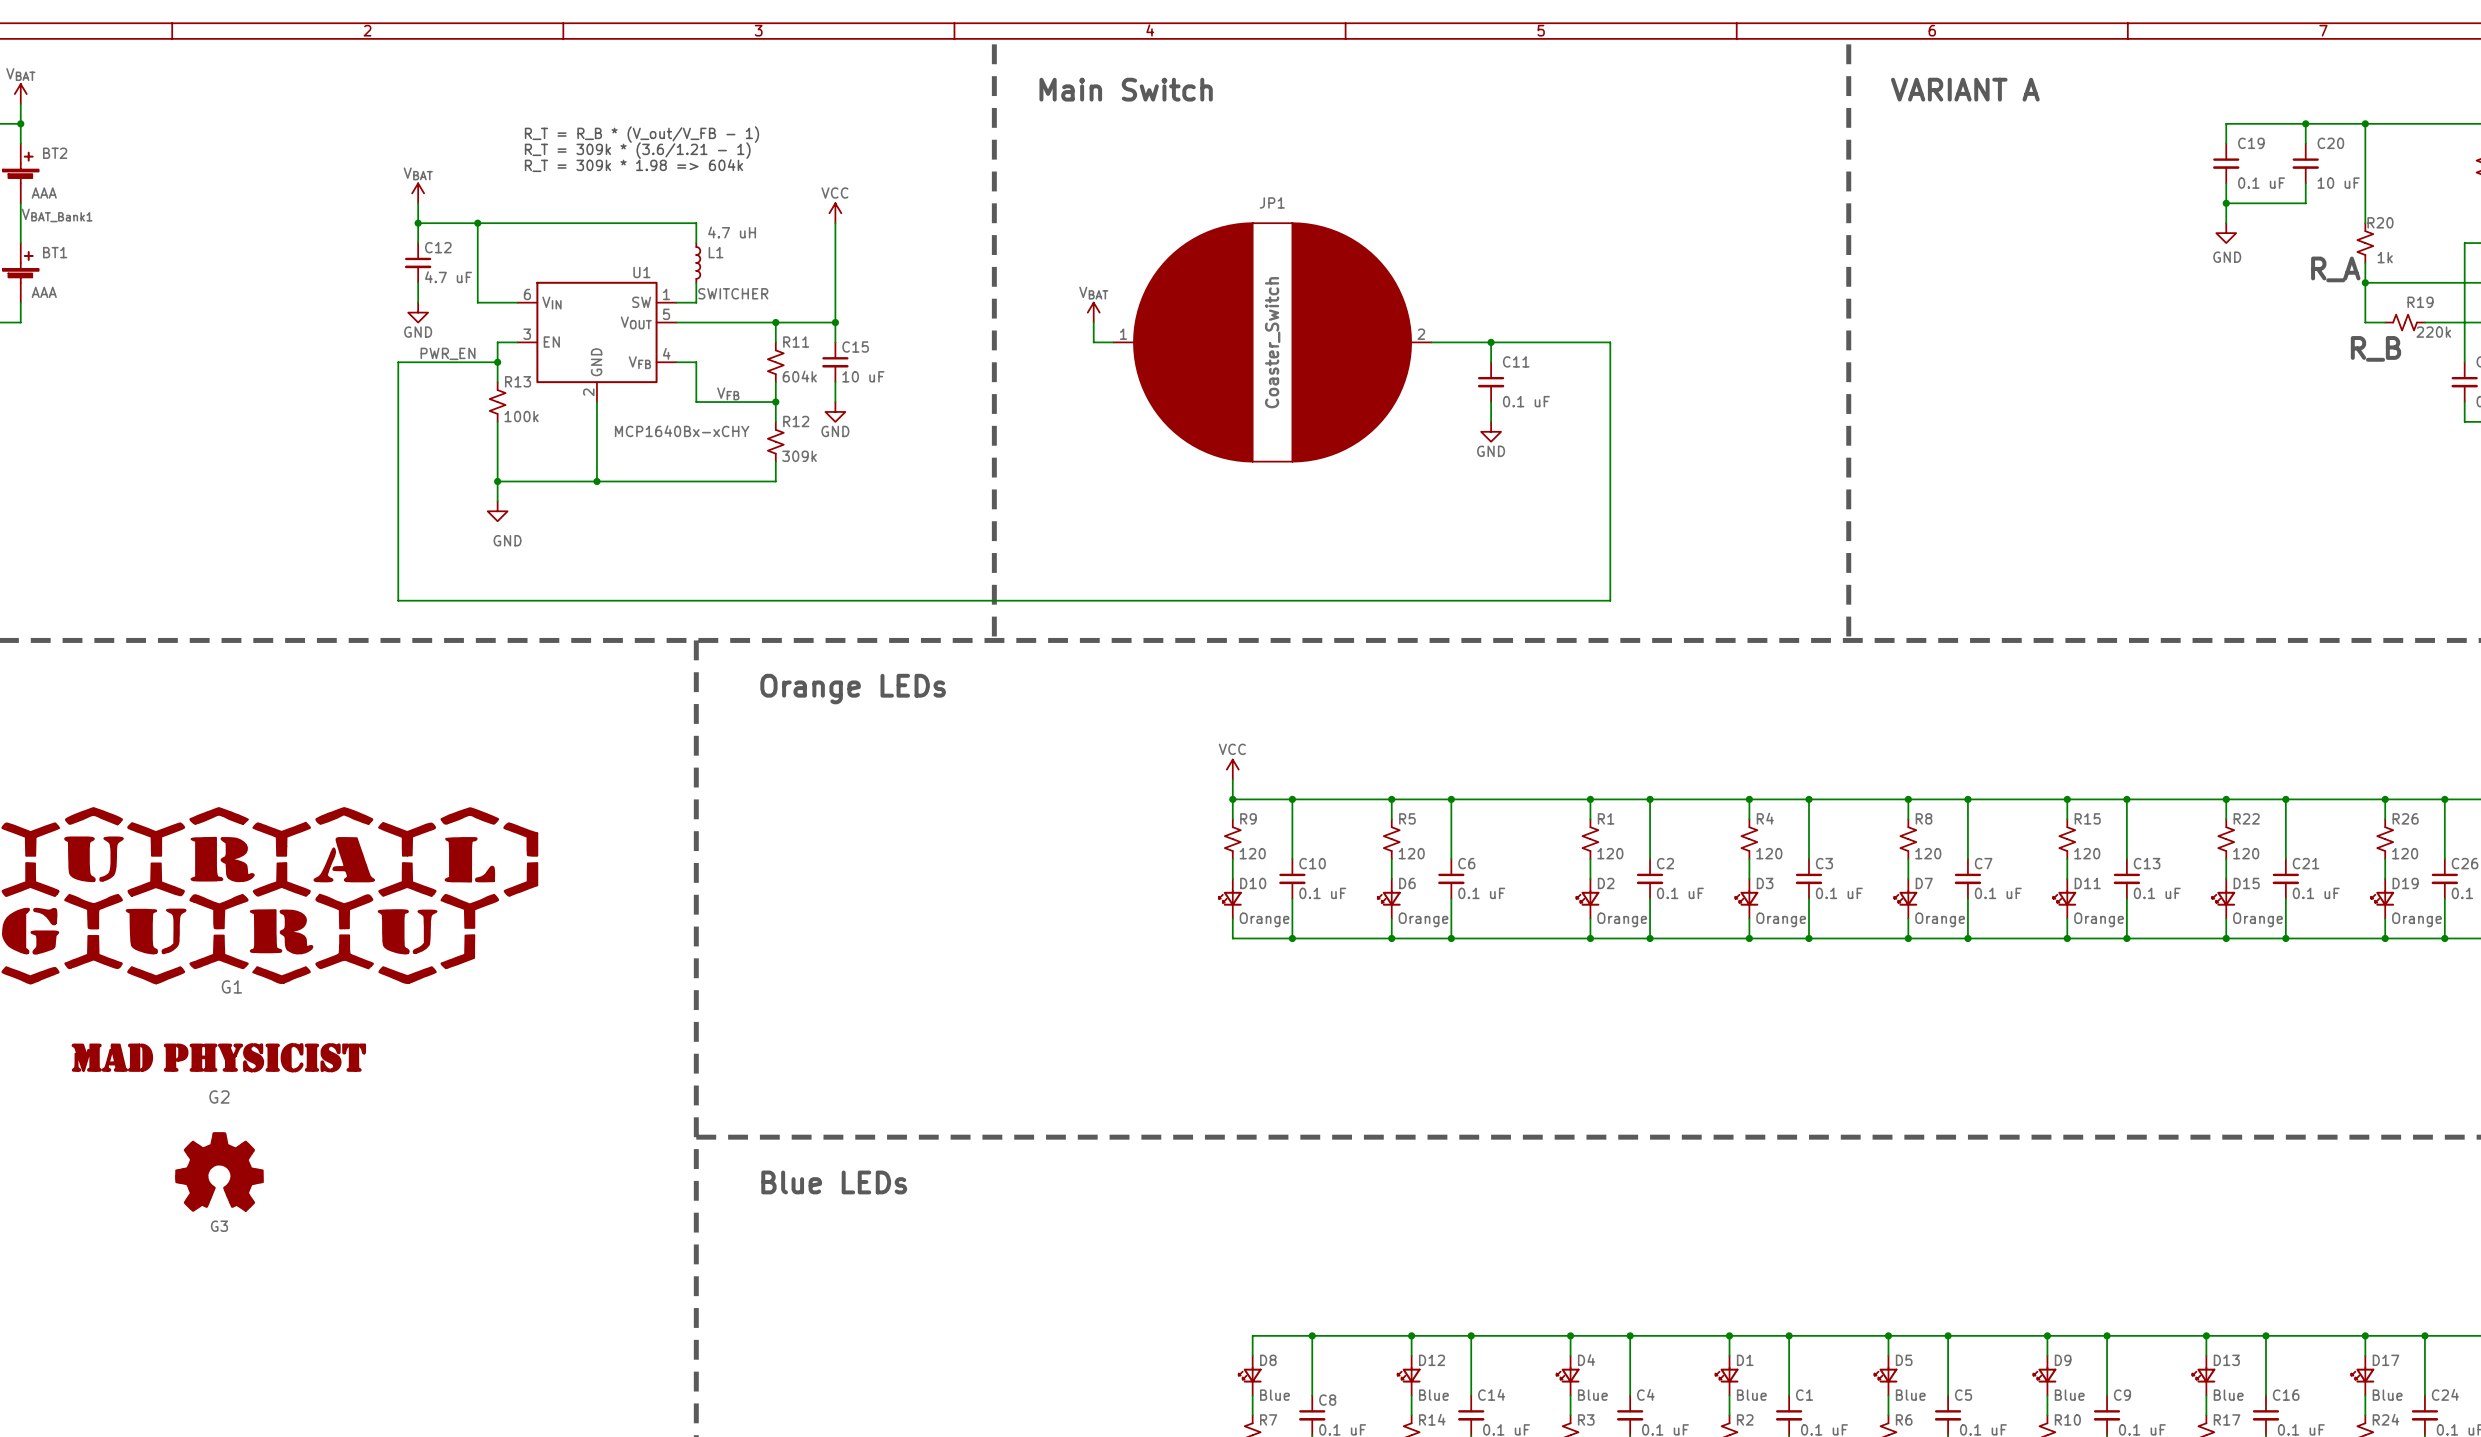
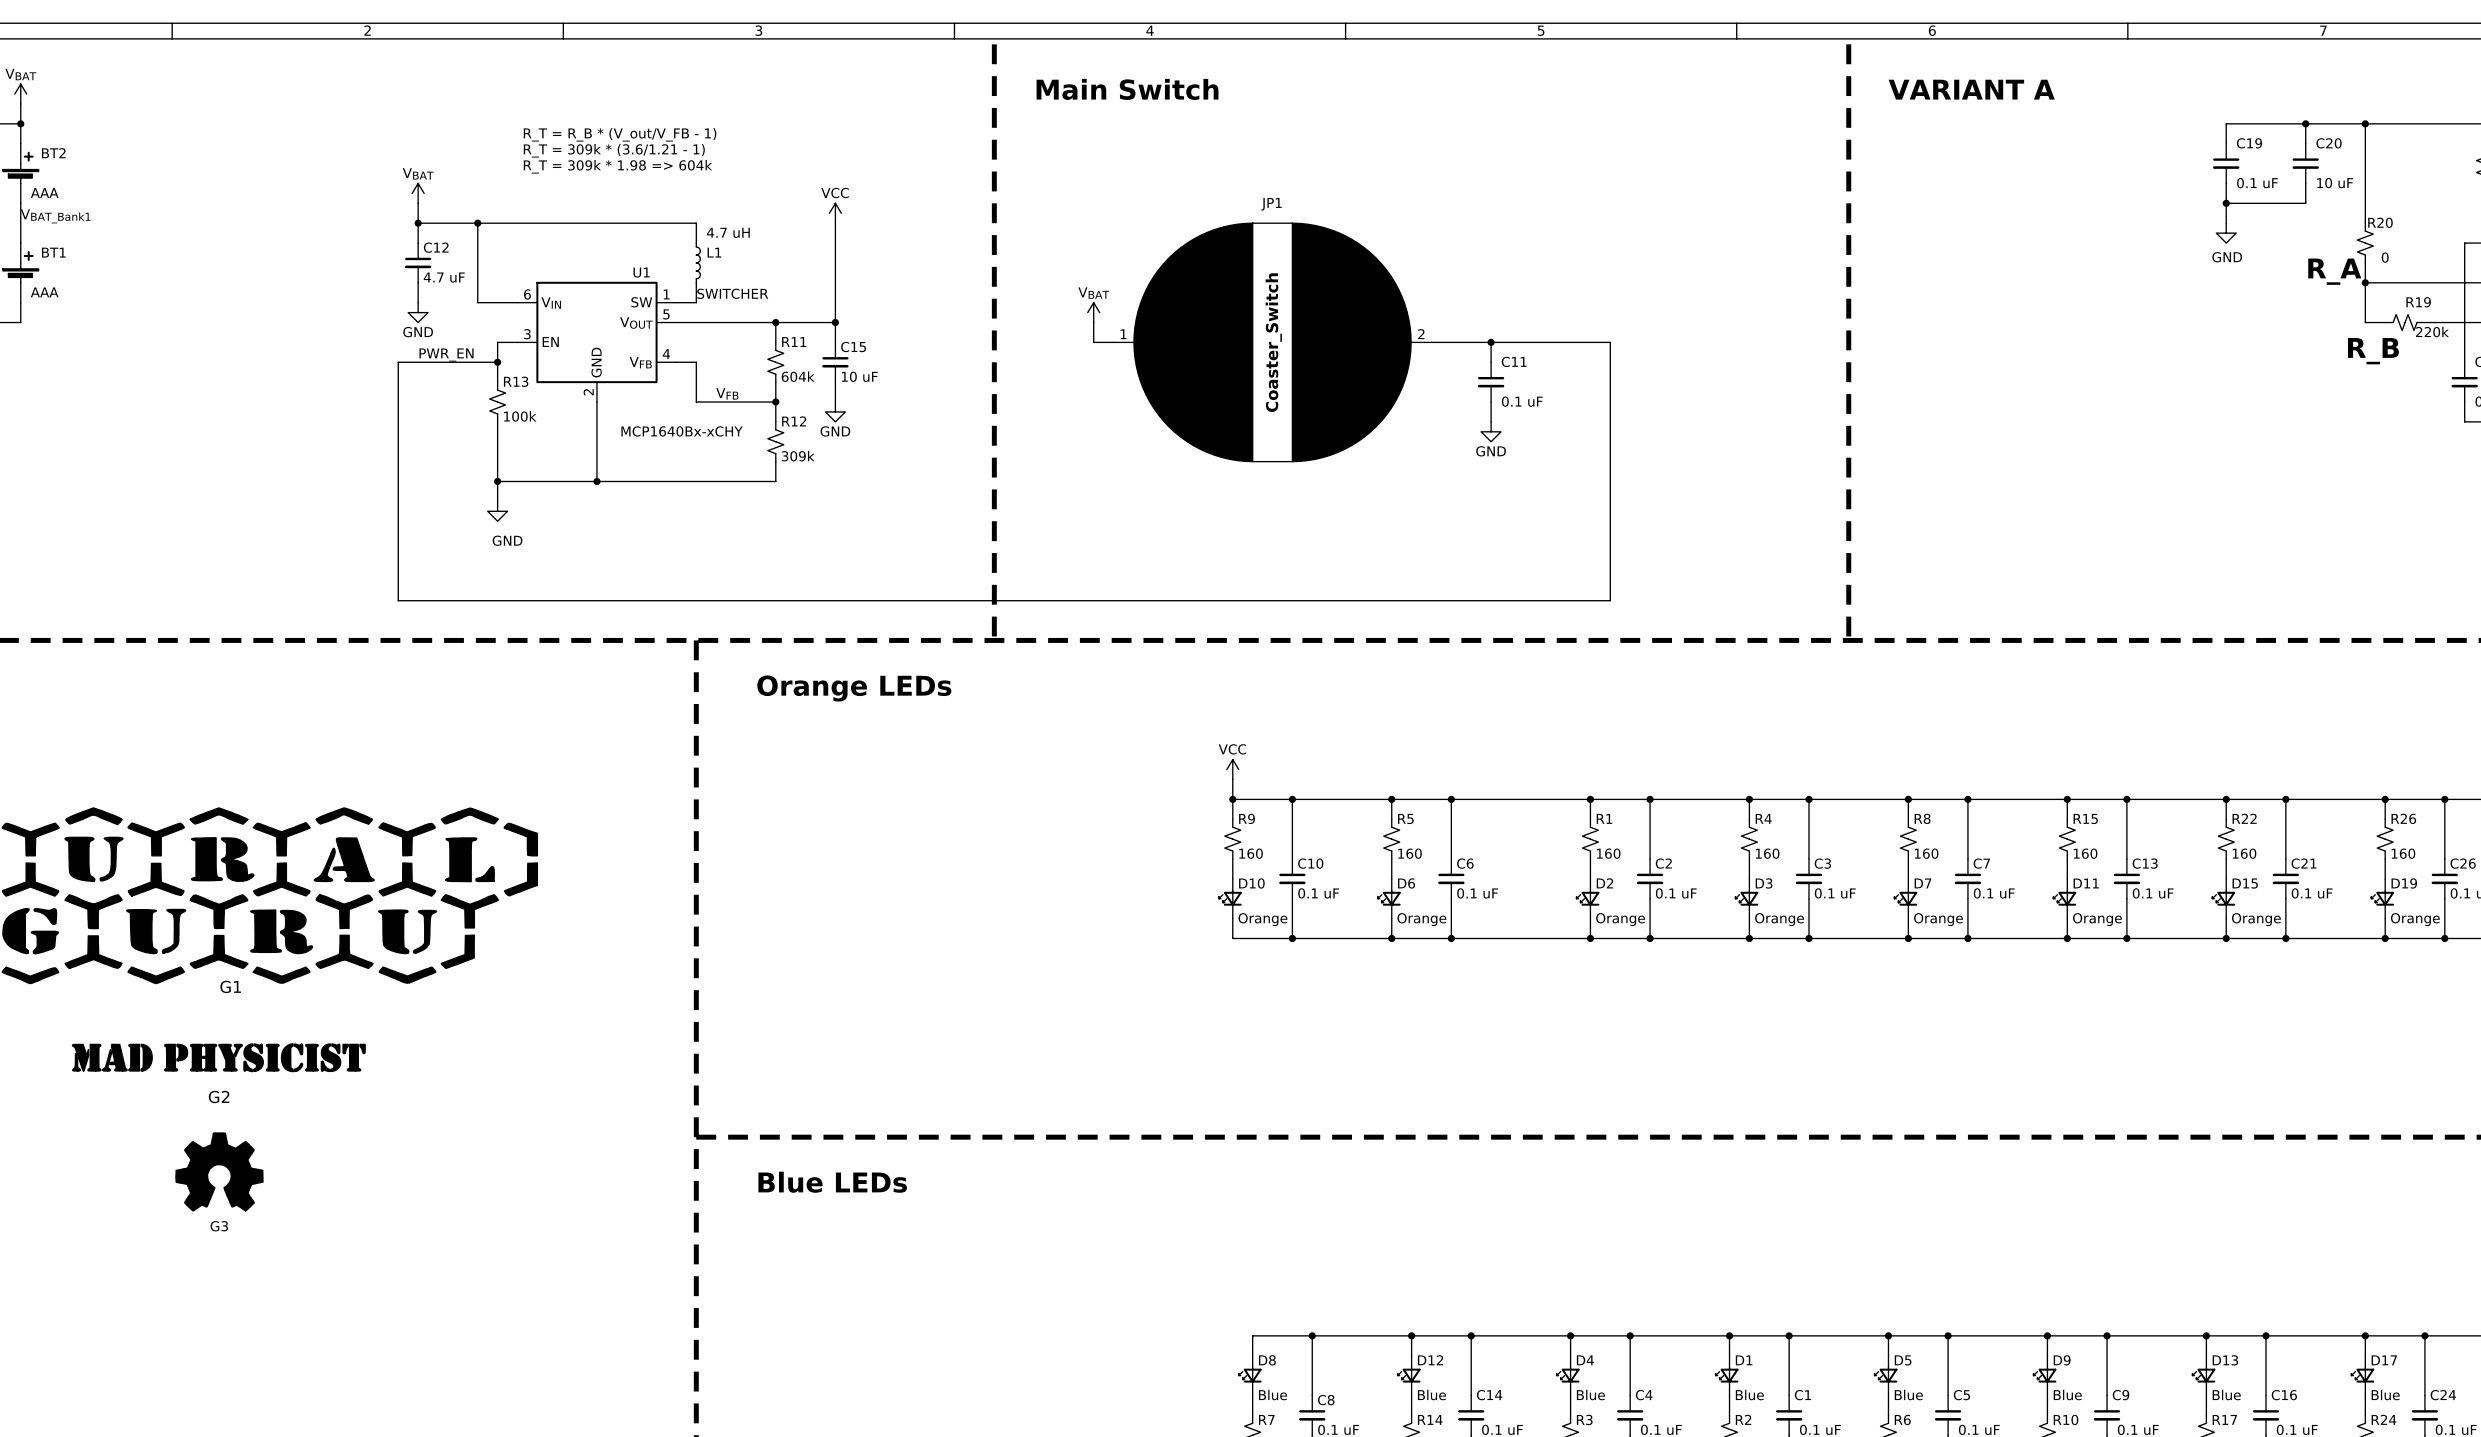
R20 value: 1k (2385, 257) -> 0 (2385, 257)
R9 value: 120 (1252, 853) -> 160 (1251, 853)
R5 value: 120 (1411, 853) -> 160 (1410, 853)
R1 value: 120 (1610, 853) -> 160 (1608, 853)
R4 value: 120 (1769, 853) -> 160 (1767, 853)
R8 value: 120 (1928, 853) -> 160 (1926, 853)
R15 value: 120 (2087, 853) -> 160 (2085, 853)
R22 value: 120 (2246, 853) -> 160 (2244, 853)
R26 value: 120 (2405, 853) -> 160 (2403, 853)

